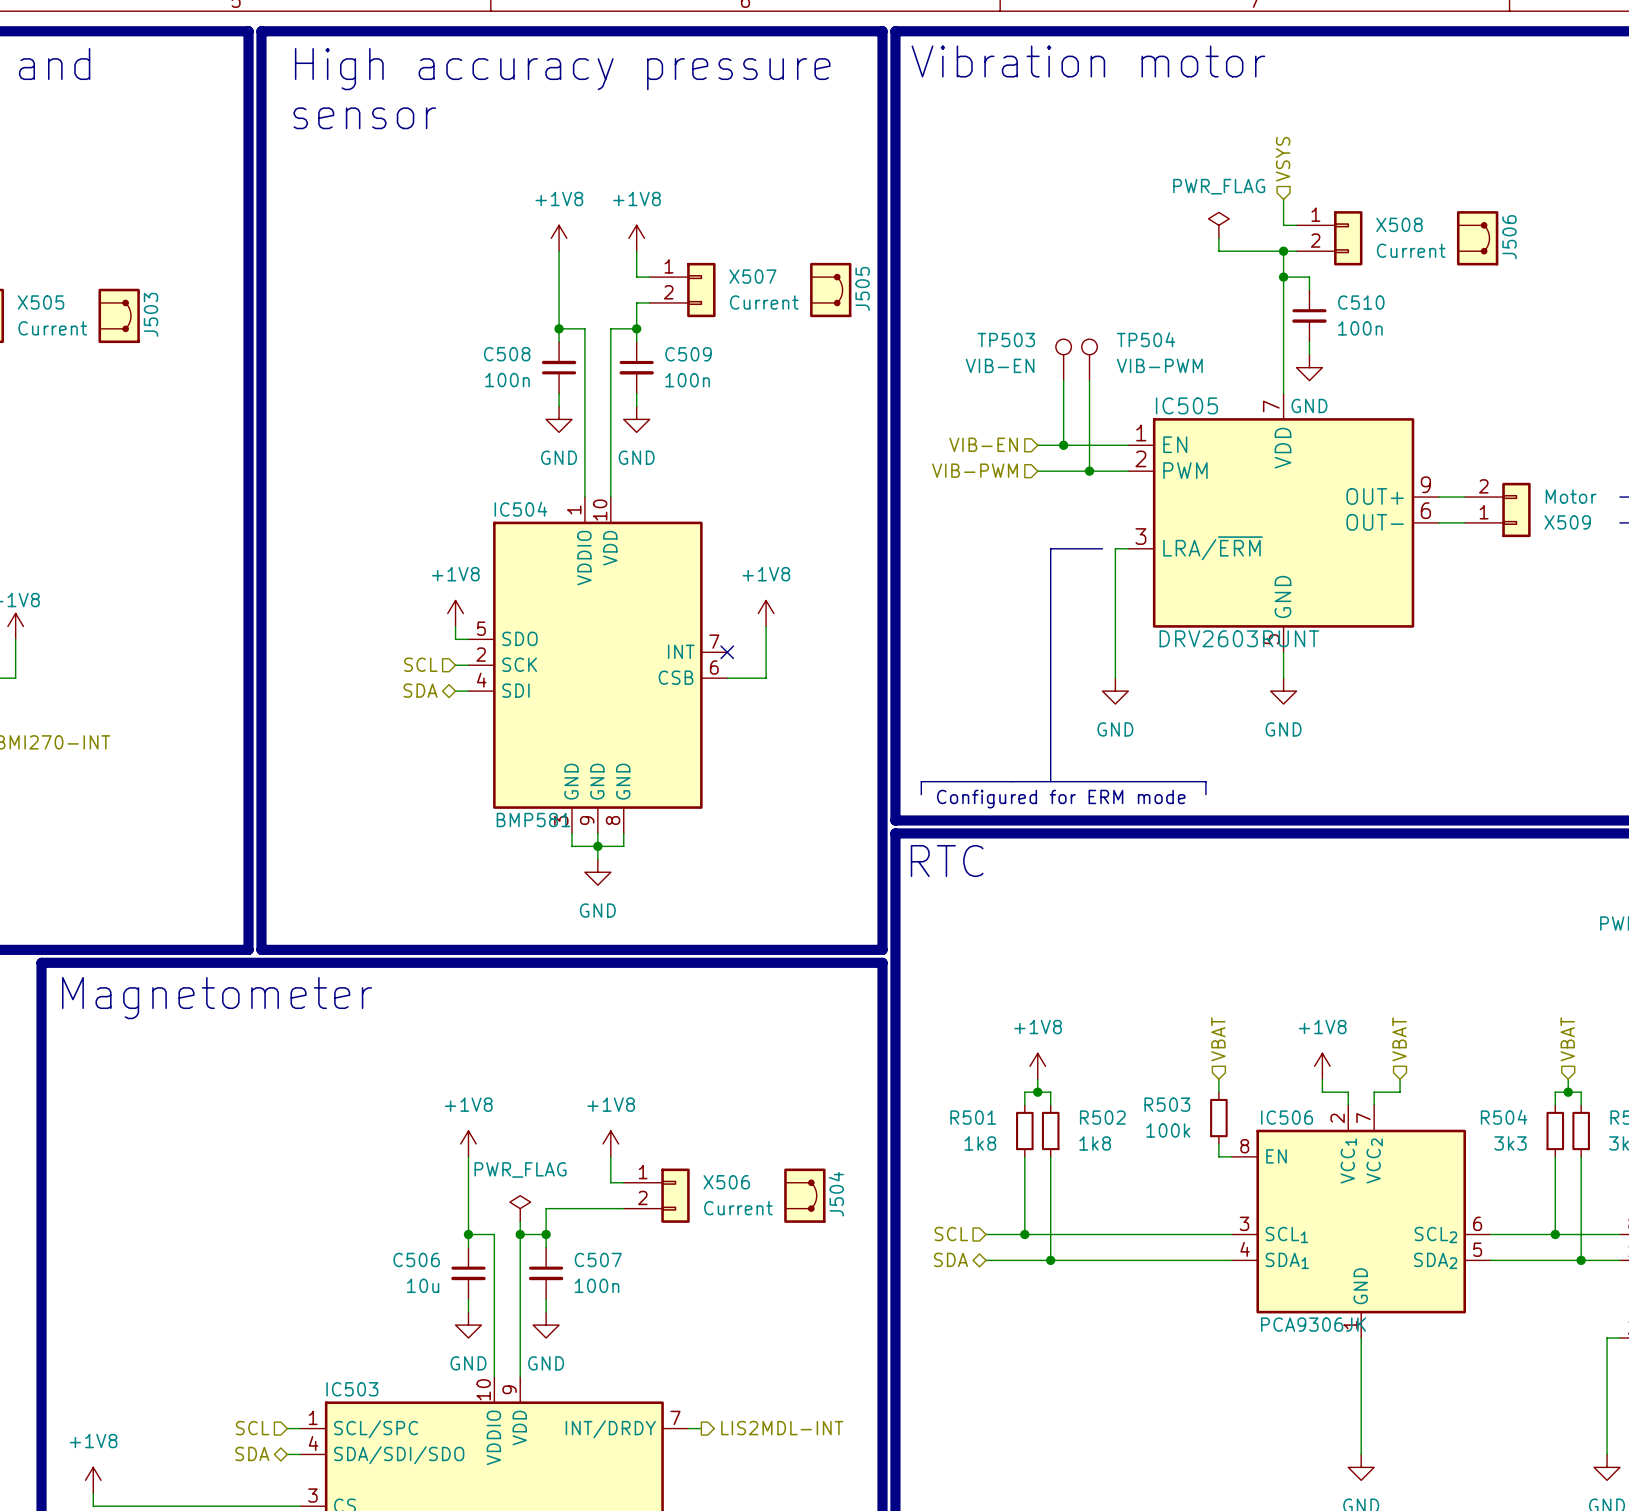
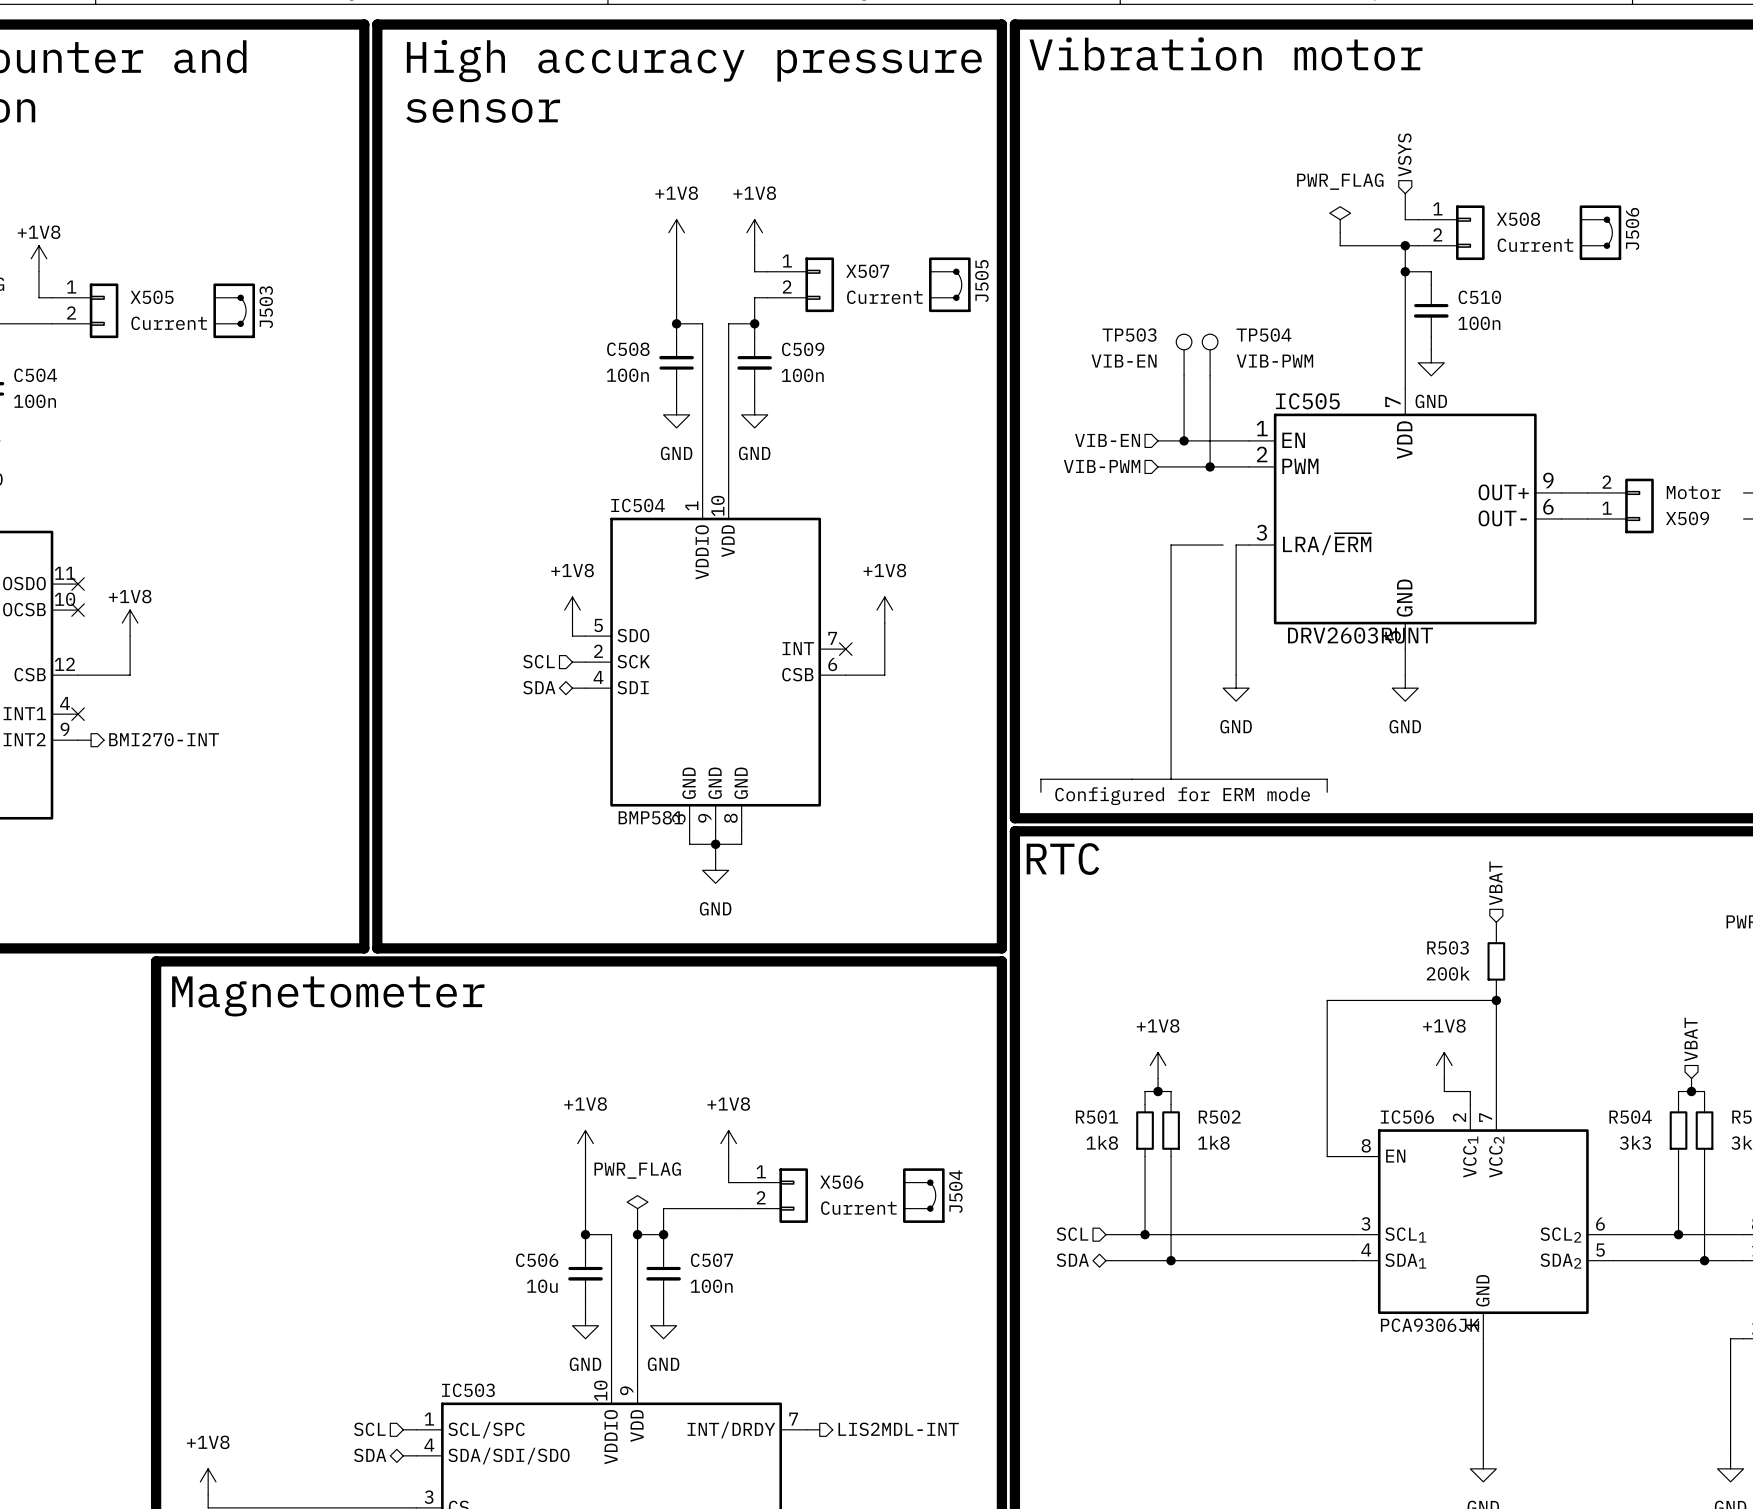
hierarchical label: none -> VBAT (1495, 883)
junction: none -> (1496, 1000)
hierarchical label: VBAT (1218, 1039) -> none
hierarchical label: VBAT (1399, 1039) -> none
wire: (1218, 1079) (1218, 1092) -> (1496, 922) (1496, 935)
wire: (1400, 1079) (1400, 1092) (1374, 1092) -> (1496, 987) (1496, 1091)
R503 position: (1218, 1118) -> (1496, 961)
R503 value: 100k (1168, 1130) -> 200k (1448, 973)
wire: (1218, 1143) (1218, 1156) -> (1496, 1000) (1327, 1000) (1327, 1156) (1340, 1156)

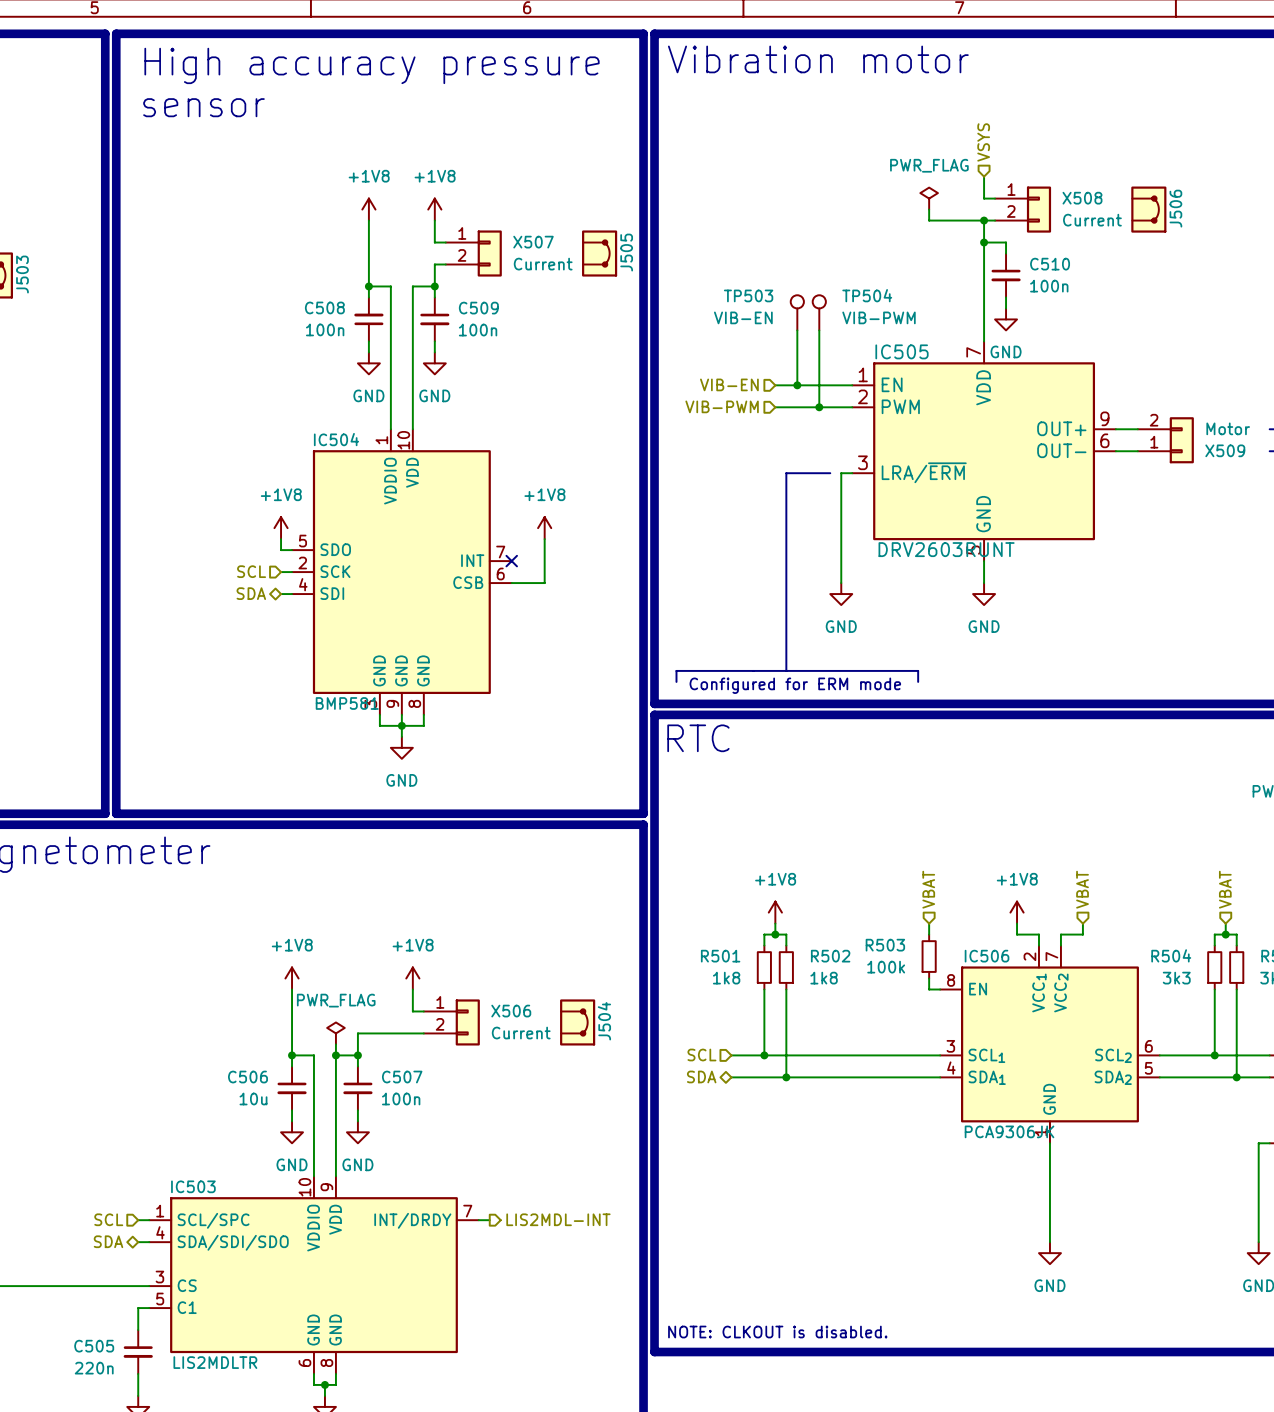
hierarchical label: VBAT (1495, 883) -> none
wire: (1496, 922) (1496, 935) -> (929, 923) (929, 934)
R503 position: (1496, 961) -> (929, 956)
R503 value: 200k (1448, 973) -> 100k (886, 967)
wire: (1496, 987) (1496, 1091) -> (1082, 923) (1082, 934) (1060, 934)
wire: (1496, 1000) (1327, 1000) (1327, 1156) (1340, 1156) -> (929, 978) (929, 989)
junction: (1496, 1000) -> none
hierarchical label: none -> VBAT (928, 889)
hierarchical label: none -> VBAT (1082, 889)

